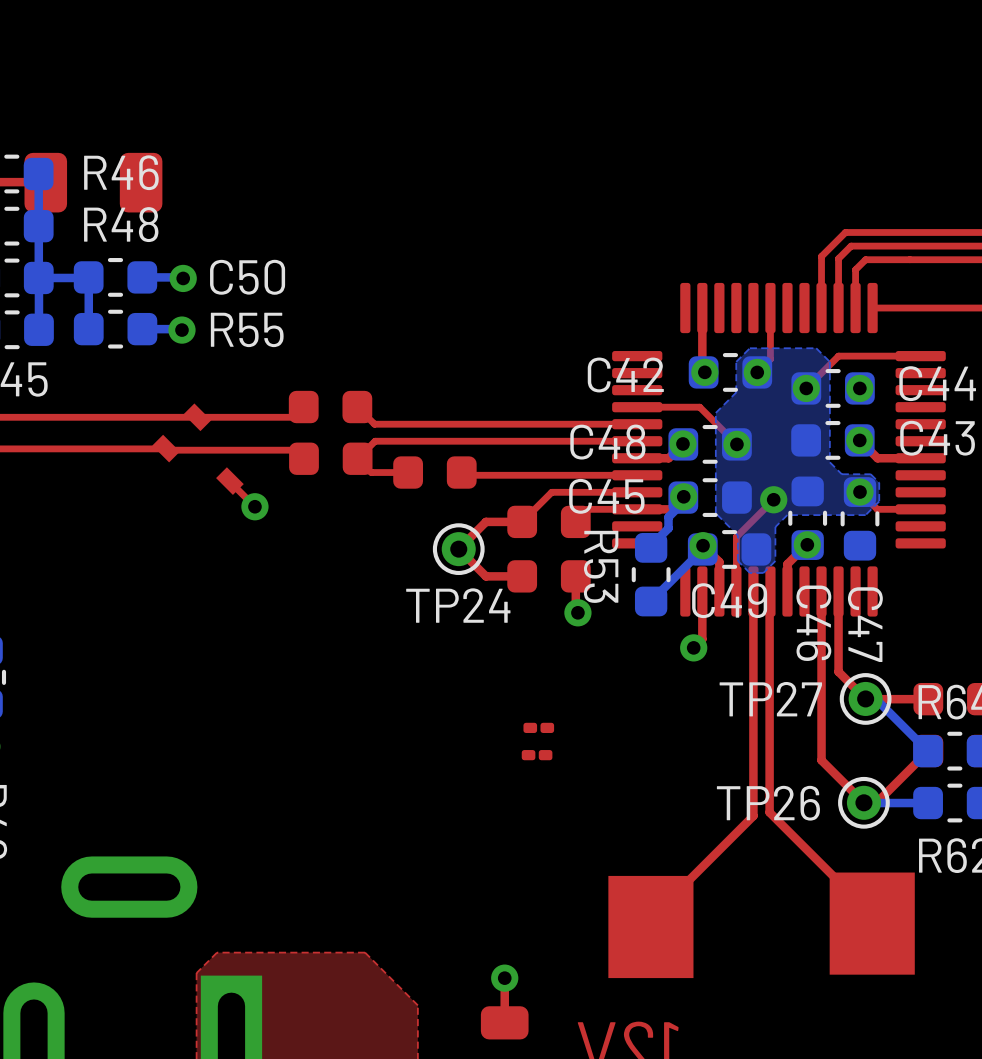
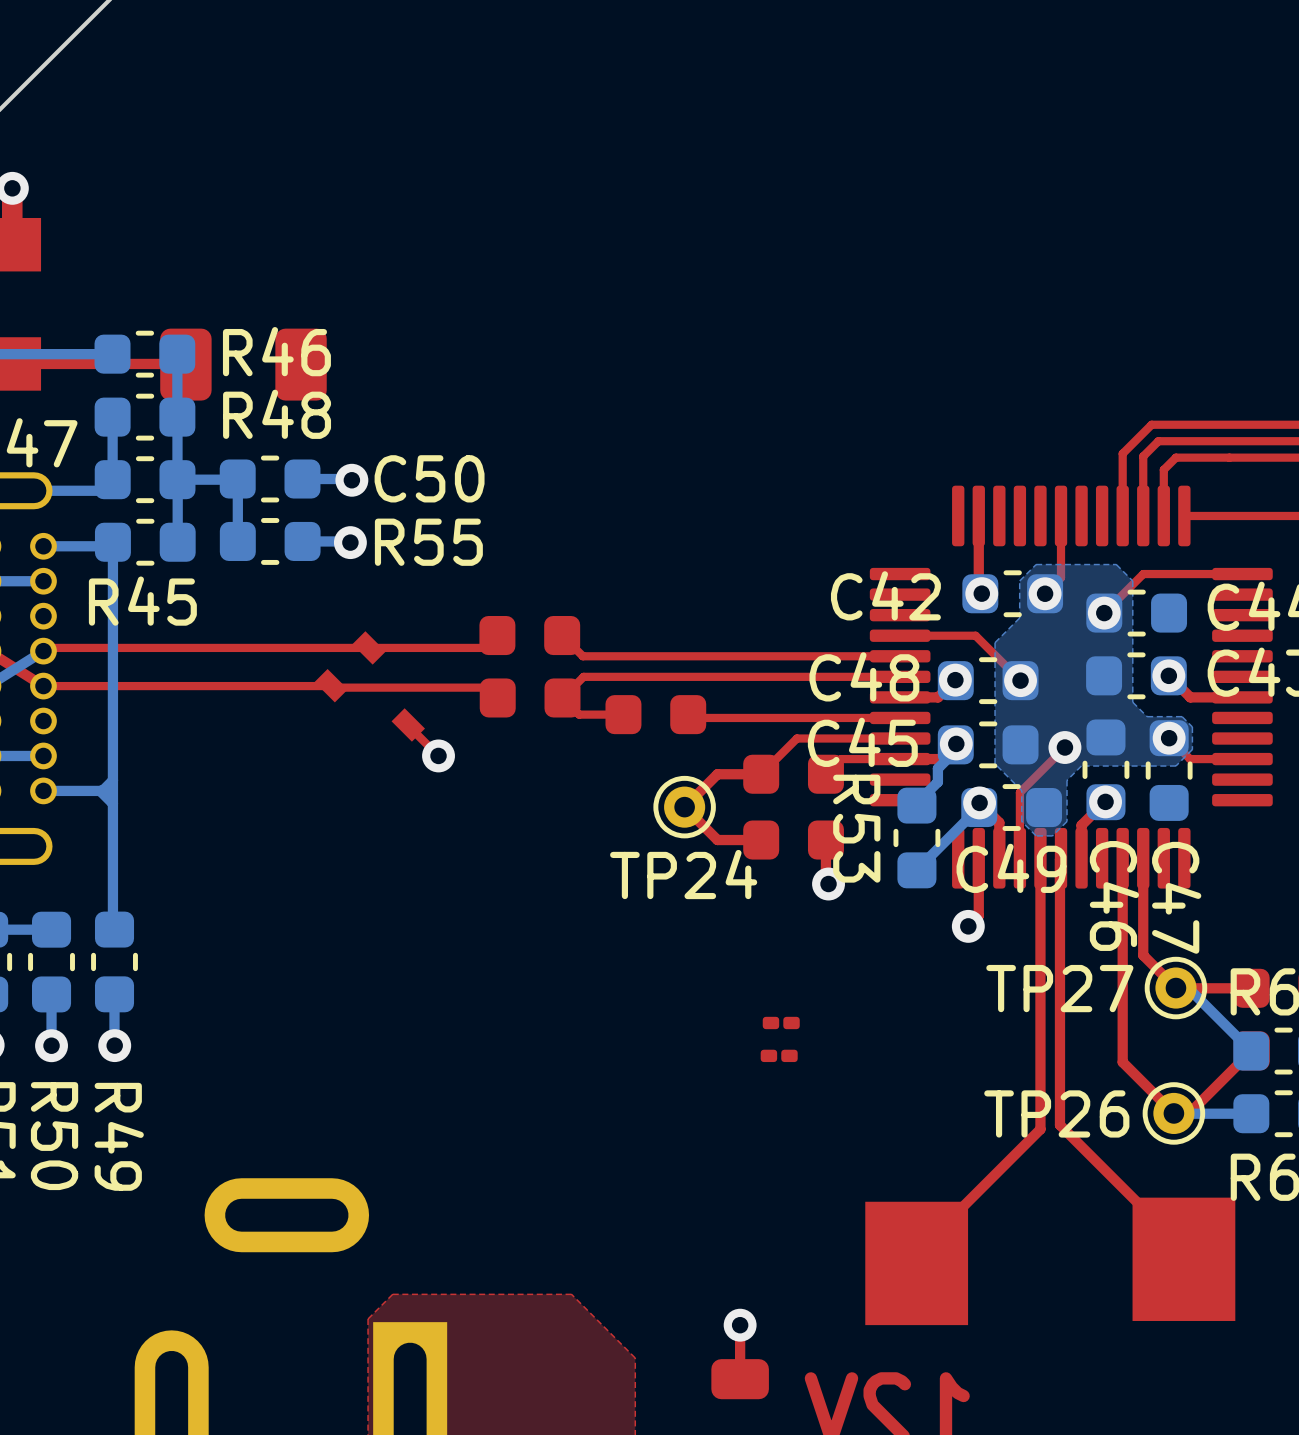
via: (859, 388) -> none

